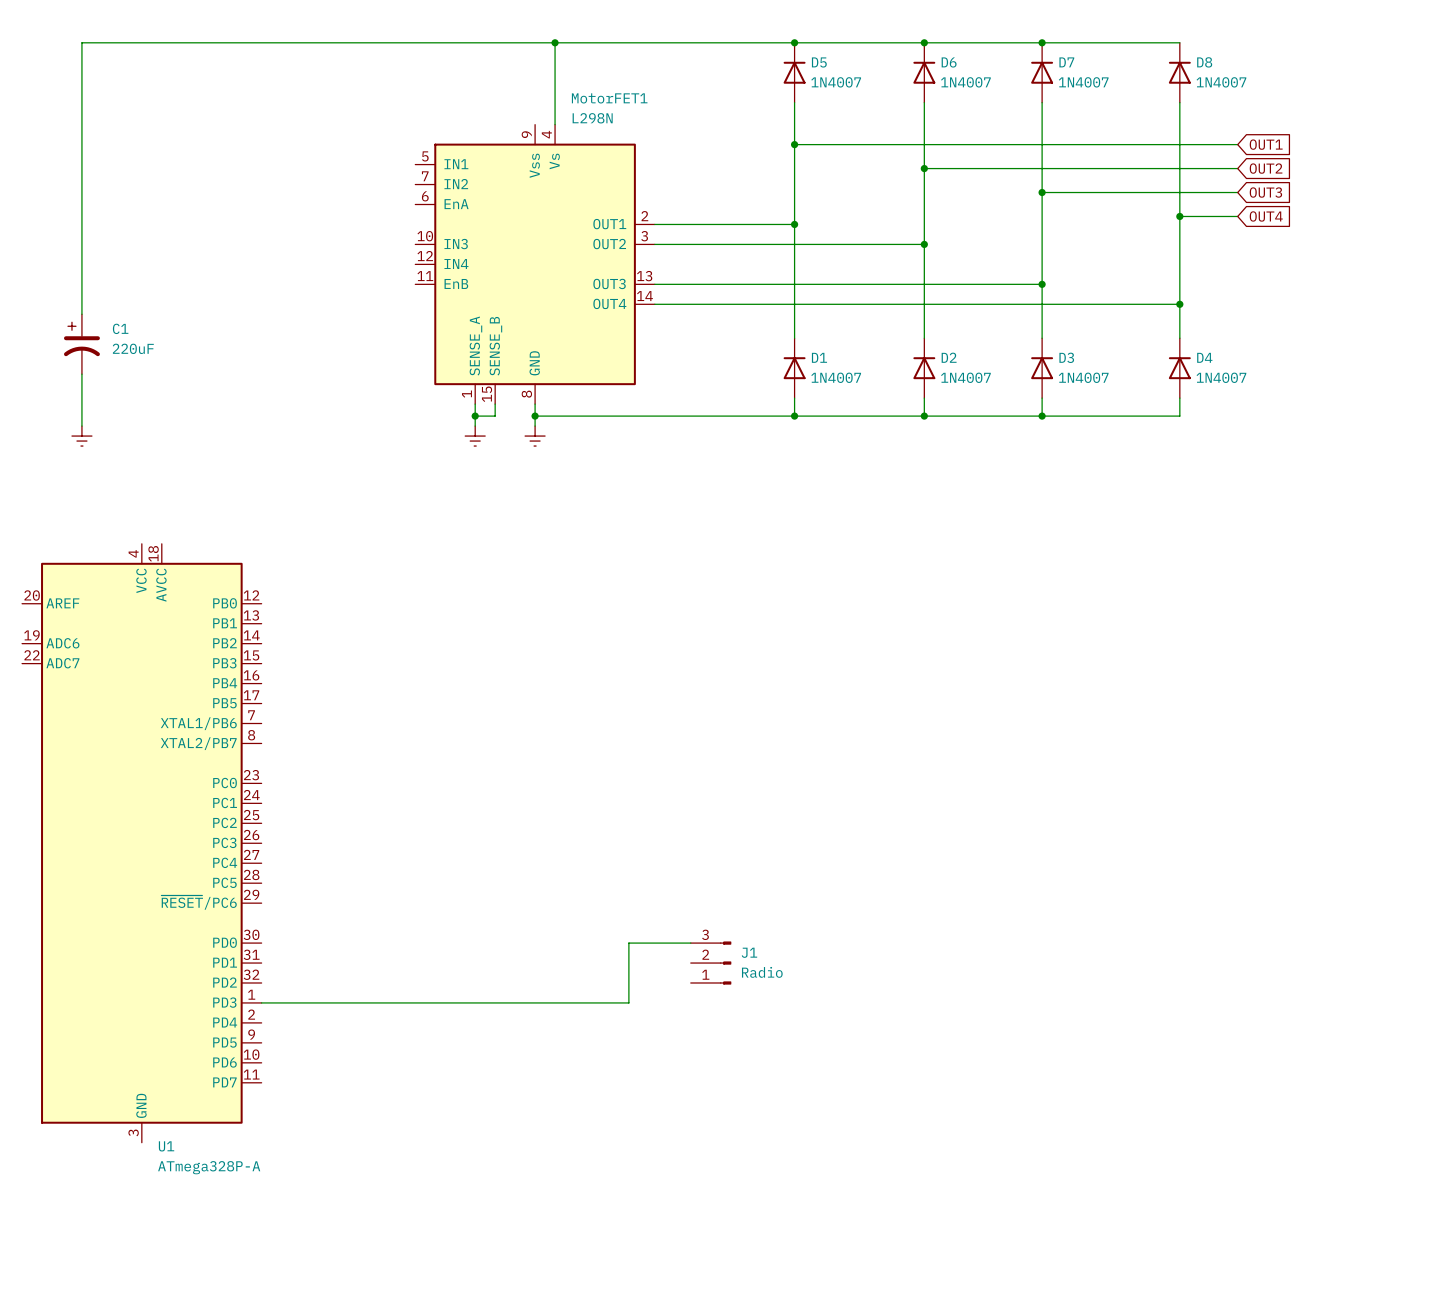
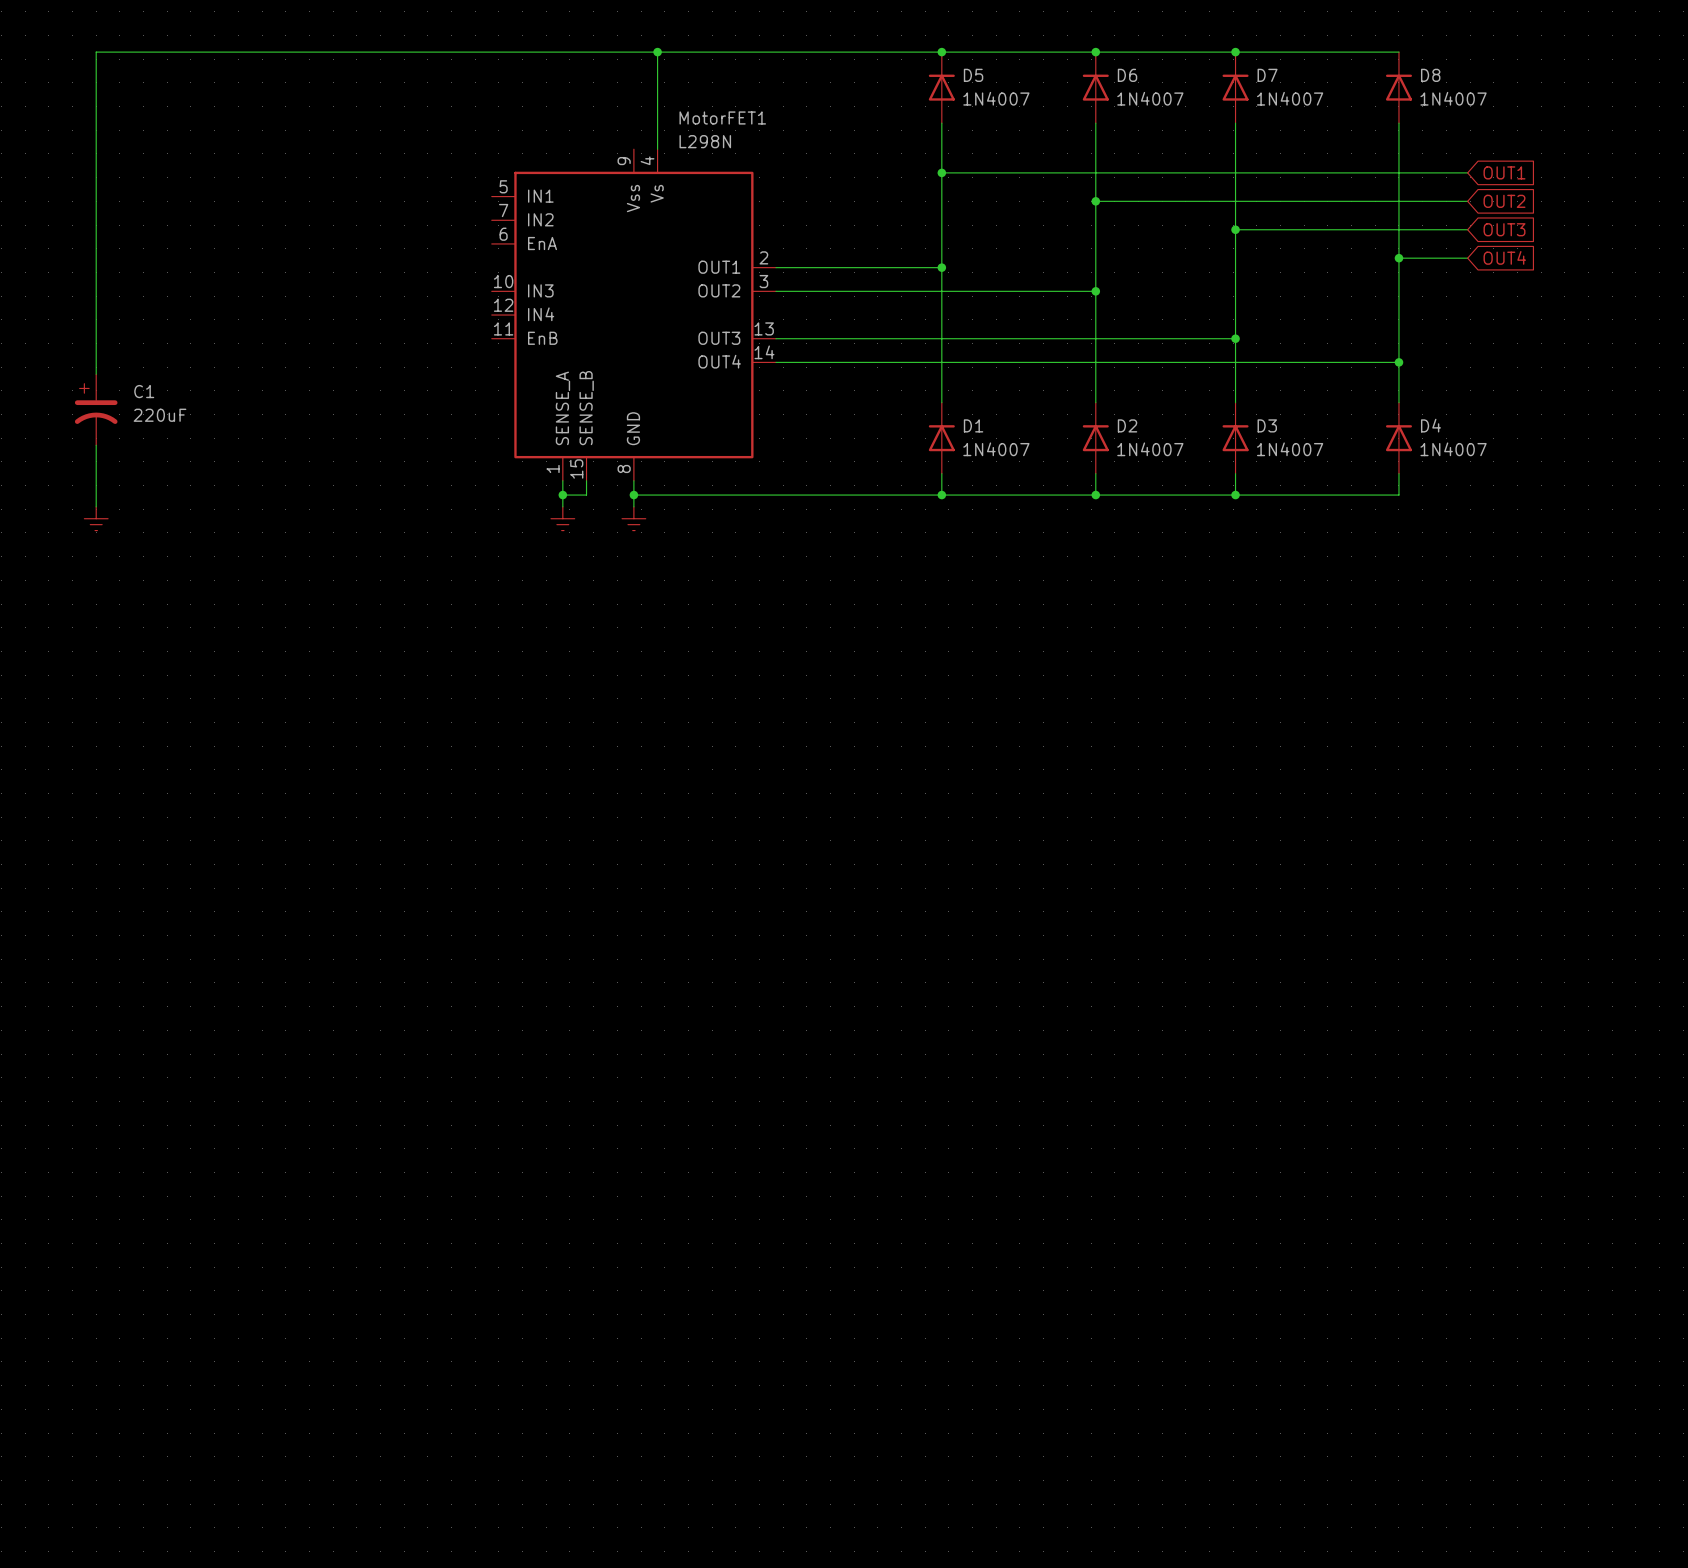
U1: ATmega328P-A (141, 843) -> none
wire: (690, 943) (628, 943) (628, 1002) (261, 1002) -> none
J1: Radio (711, 963) -> none

